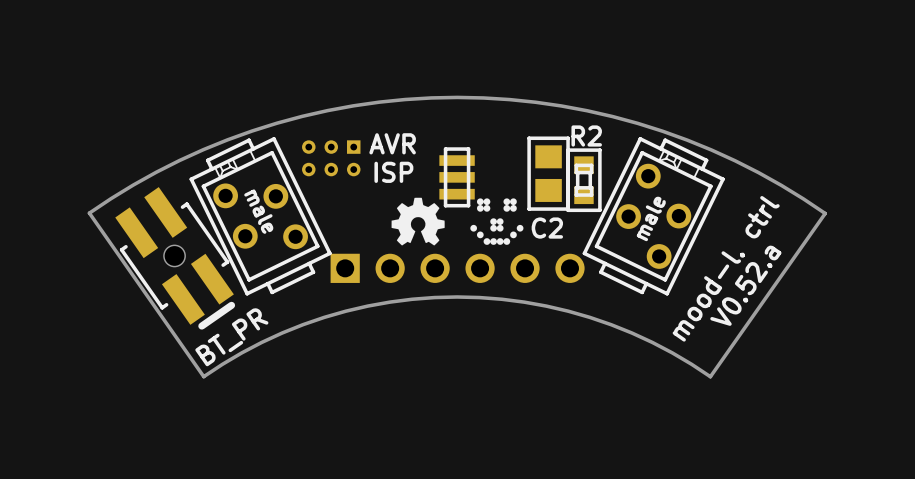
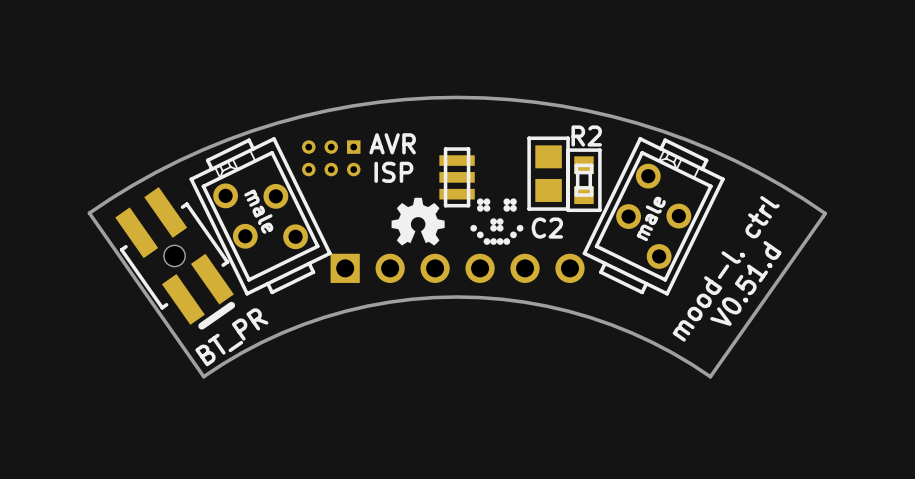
text: V0.52.a (745, 285) -> V0.51.d (745, 283)

